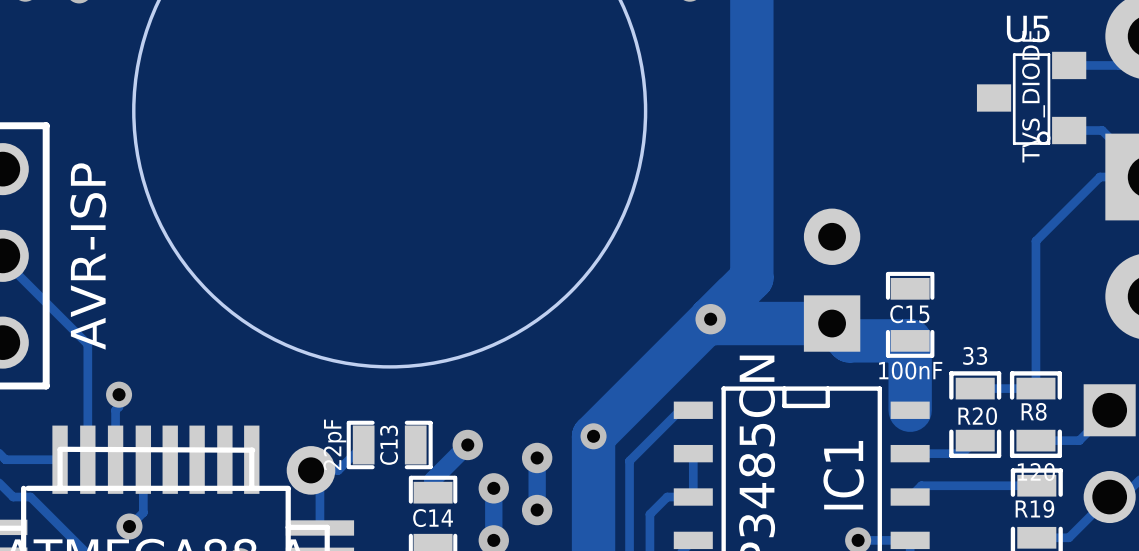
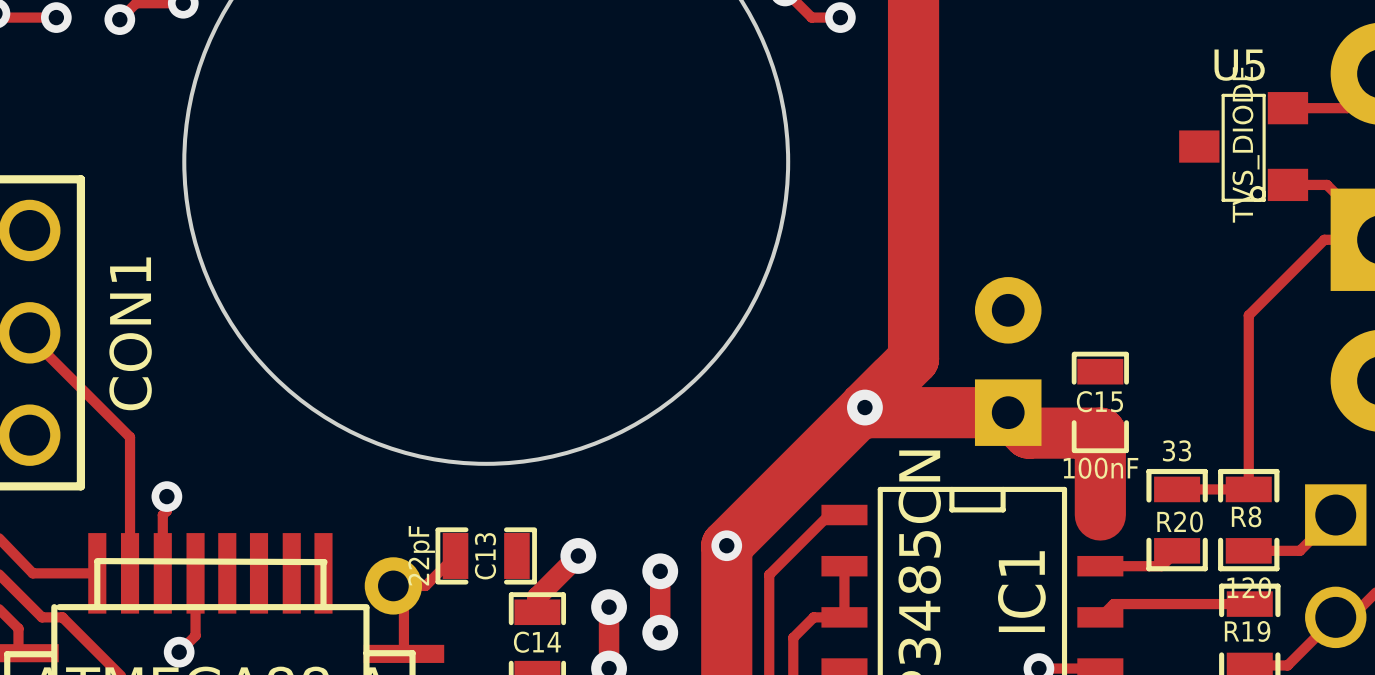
AVR-ISP name: AVR-ISP (88, 256) -> CON1 (130, 333)

